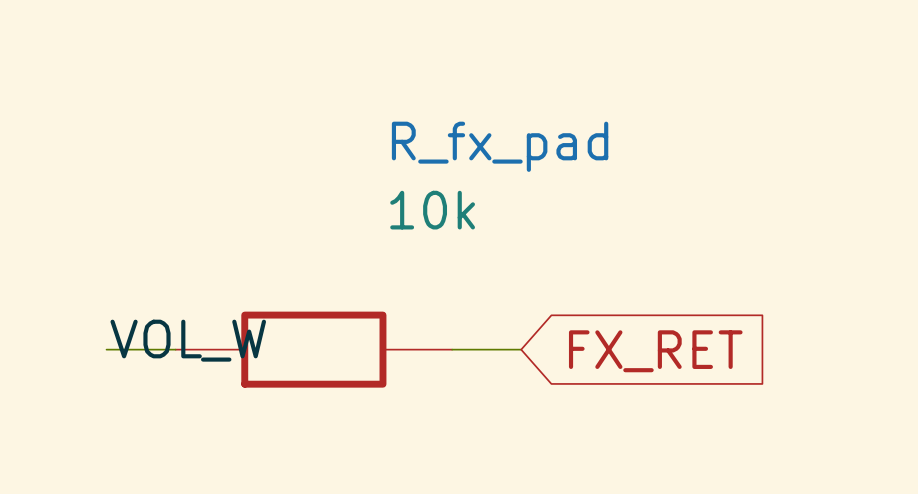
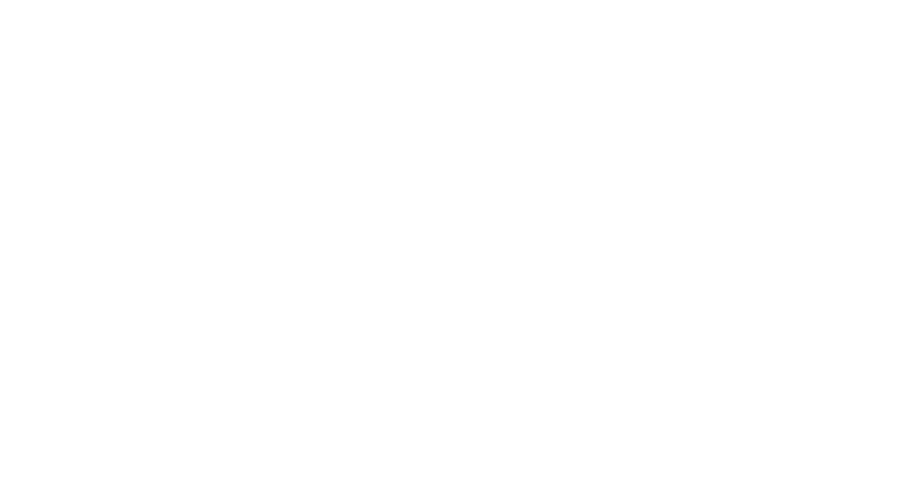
label: VOL_W (188, 340) -> none
wire: (106, 349) (175, 349) -> none
R_fx_pad: 10k (313, 349) -> none
wire: (452, 349) (521, 349) -> none
global label: FX_RET (655, 351) -> none

